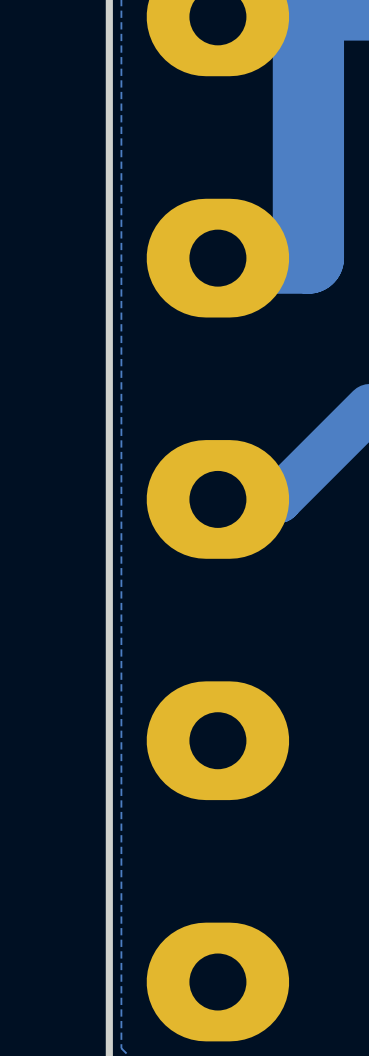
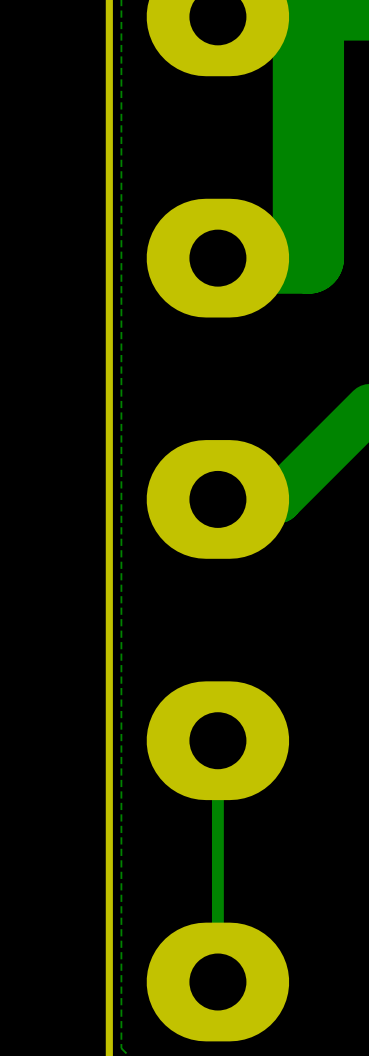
track: none -> (217, 740) (217, 982)

